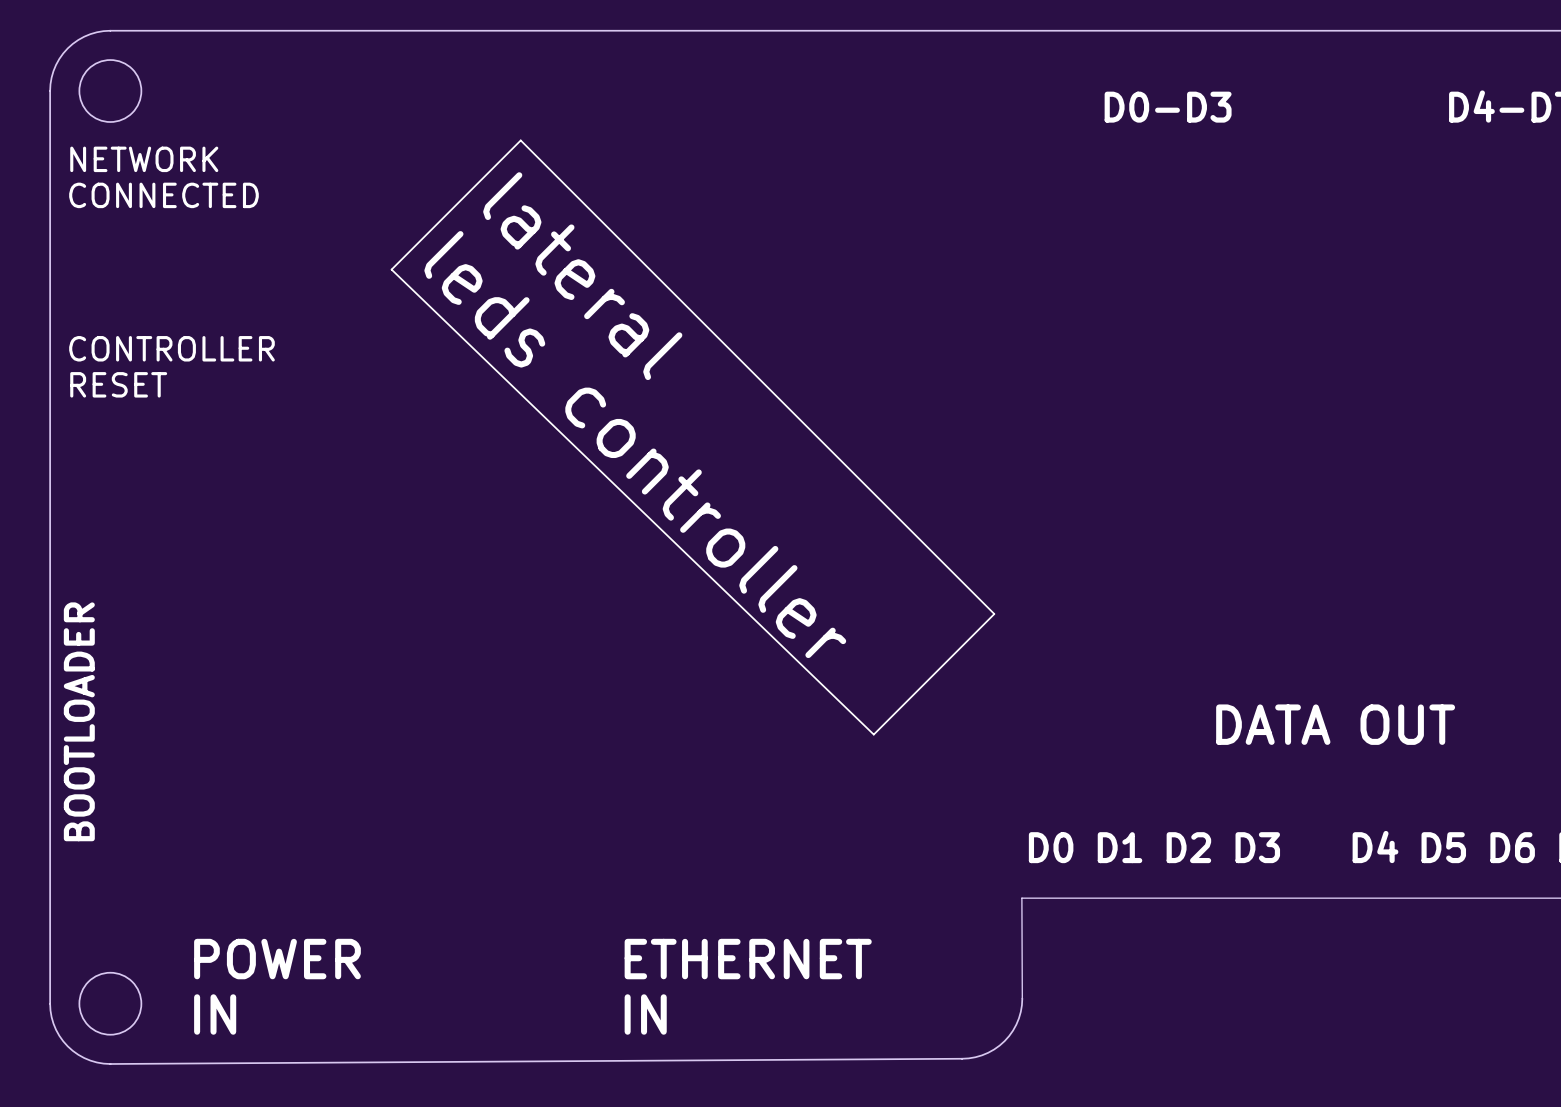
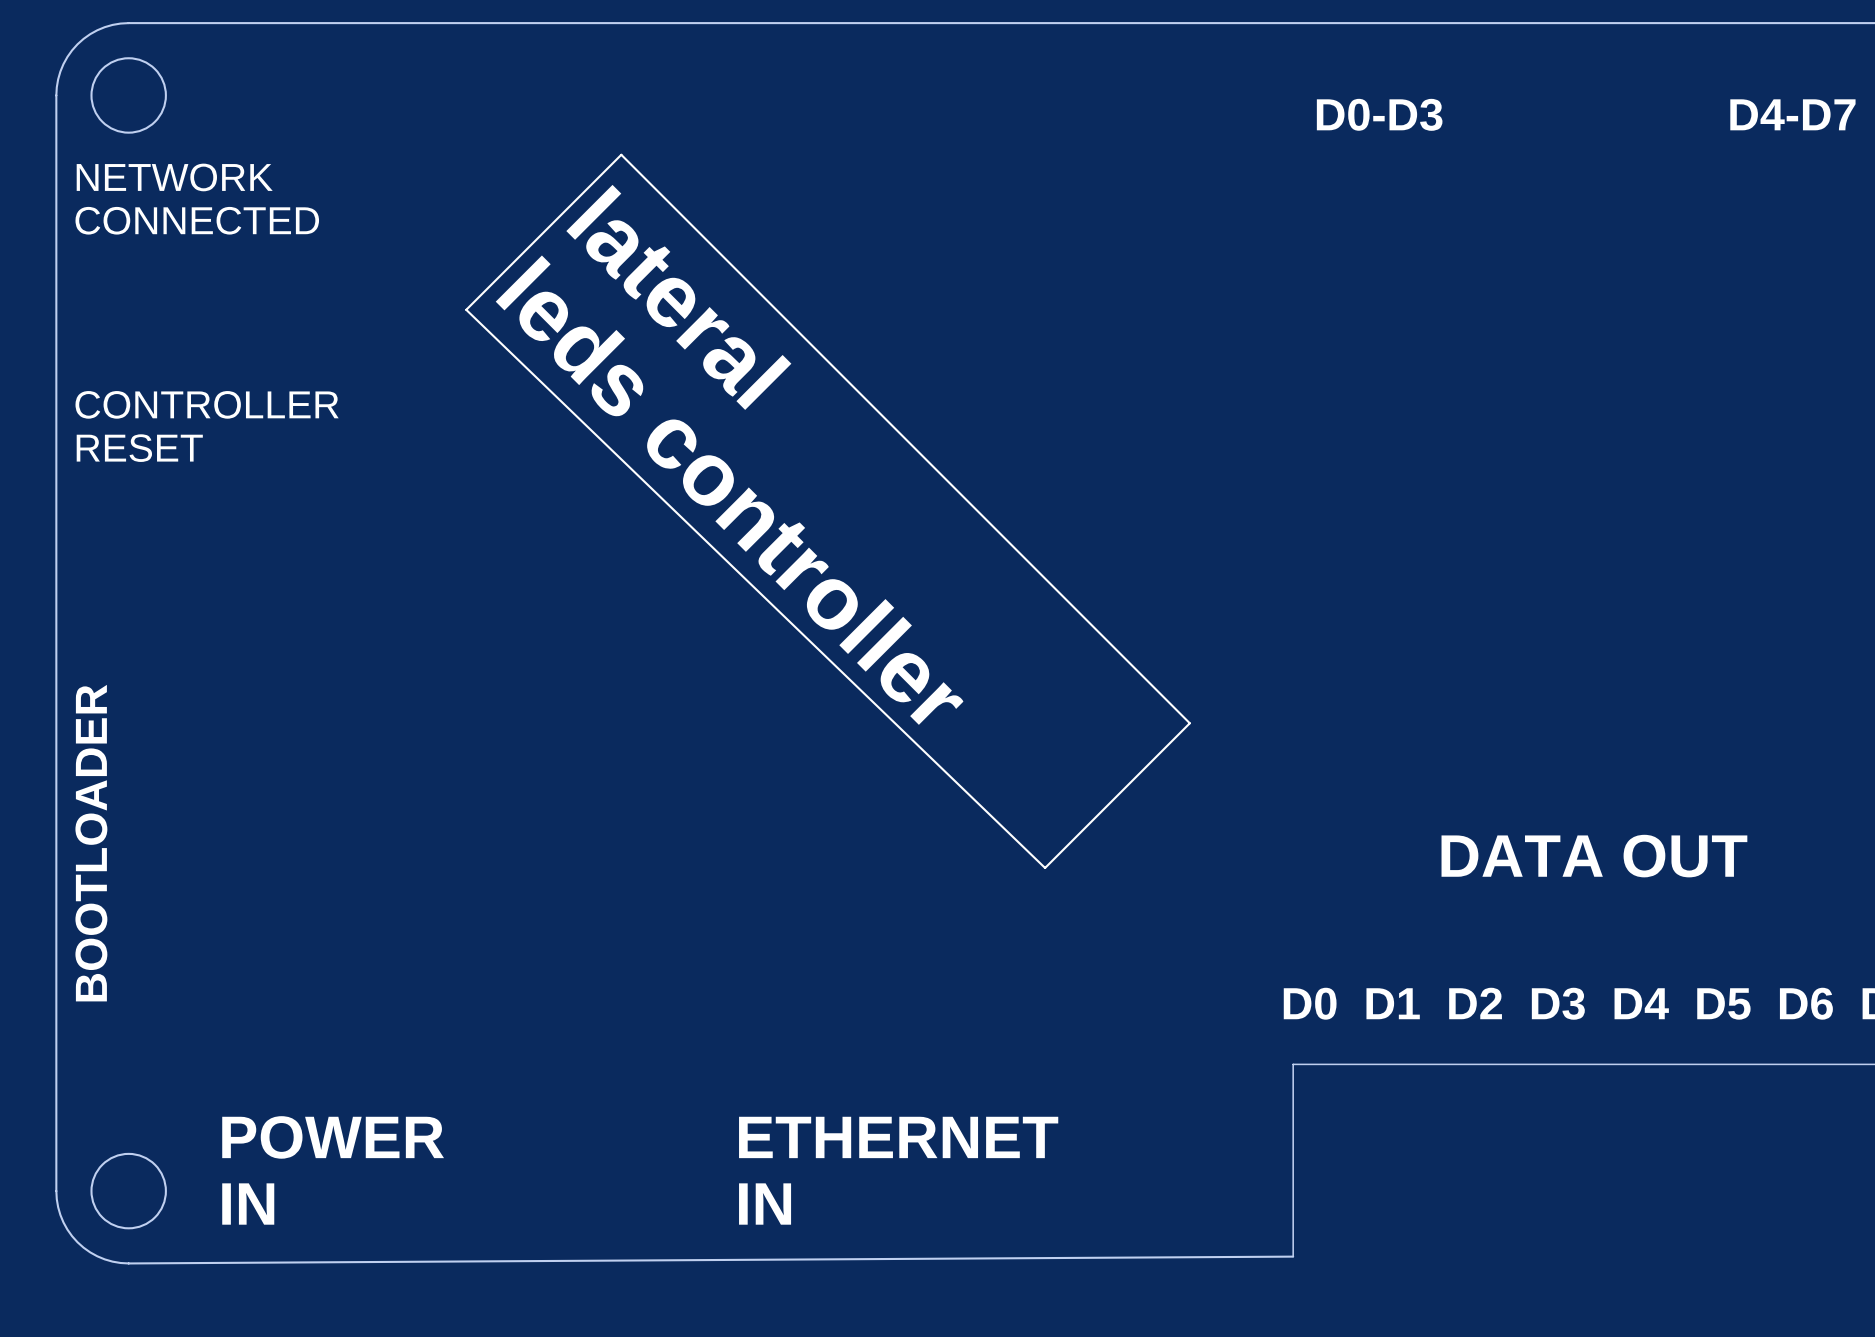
text position: D0 (1051, 847) -> D0 (1310, 1003)
text position: D1 (1120, 847) -> D1 (1393, 1003)
text position: D2 (1188, 847) -> D2 (1475, 1003)
text position: D3 (1257, 847) -> D3 (1558, 1003)
board edge: (1080, 898) (1021, 898) (1022, 998) (1018, 1018) (1013, 1030) (999, 1045) (988, 1052) (975, 1057) (110, 1064) -> (1293, 1064) (1293, 1256) (128, 1263)

